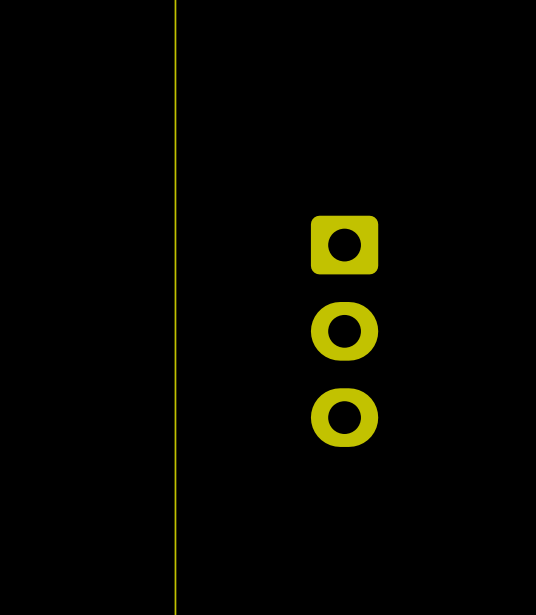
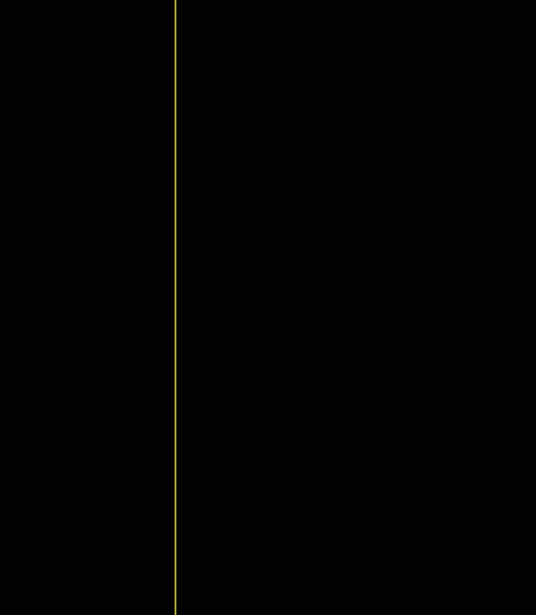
part: (344, 331) -> none

